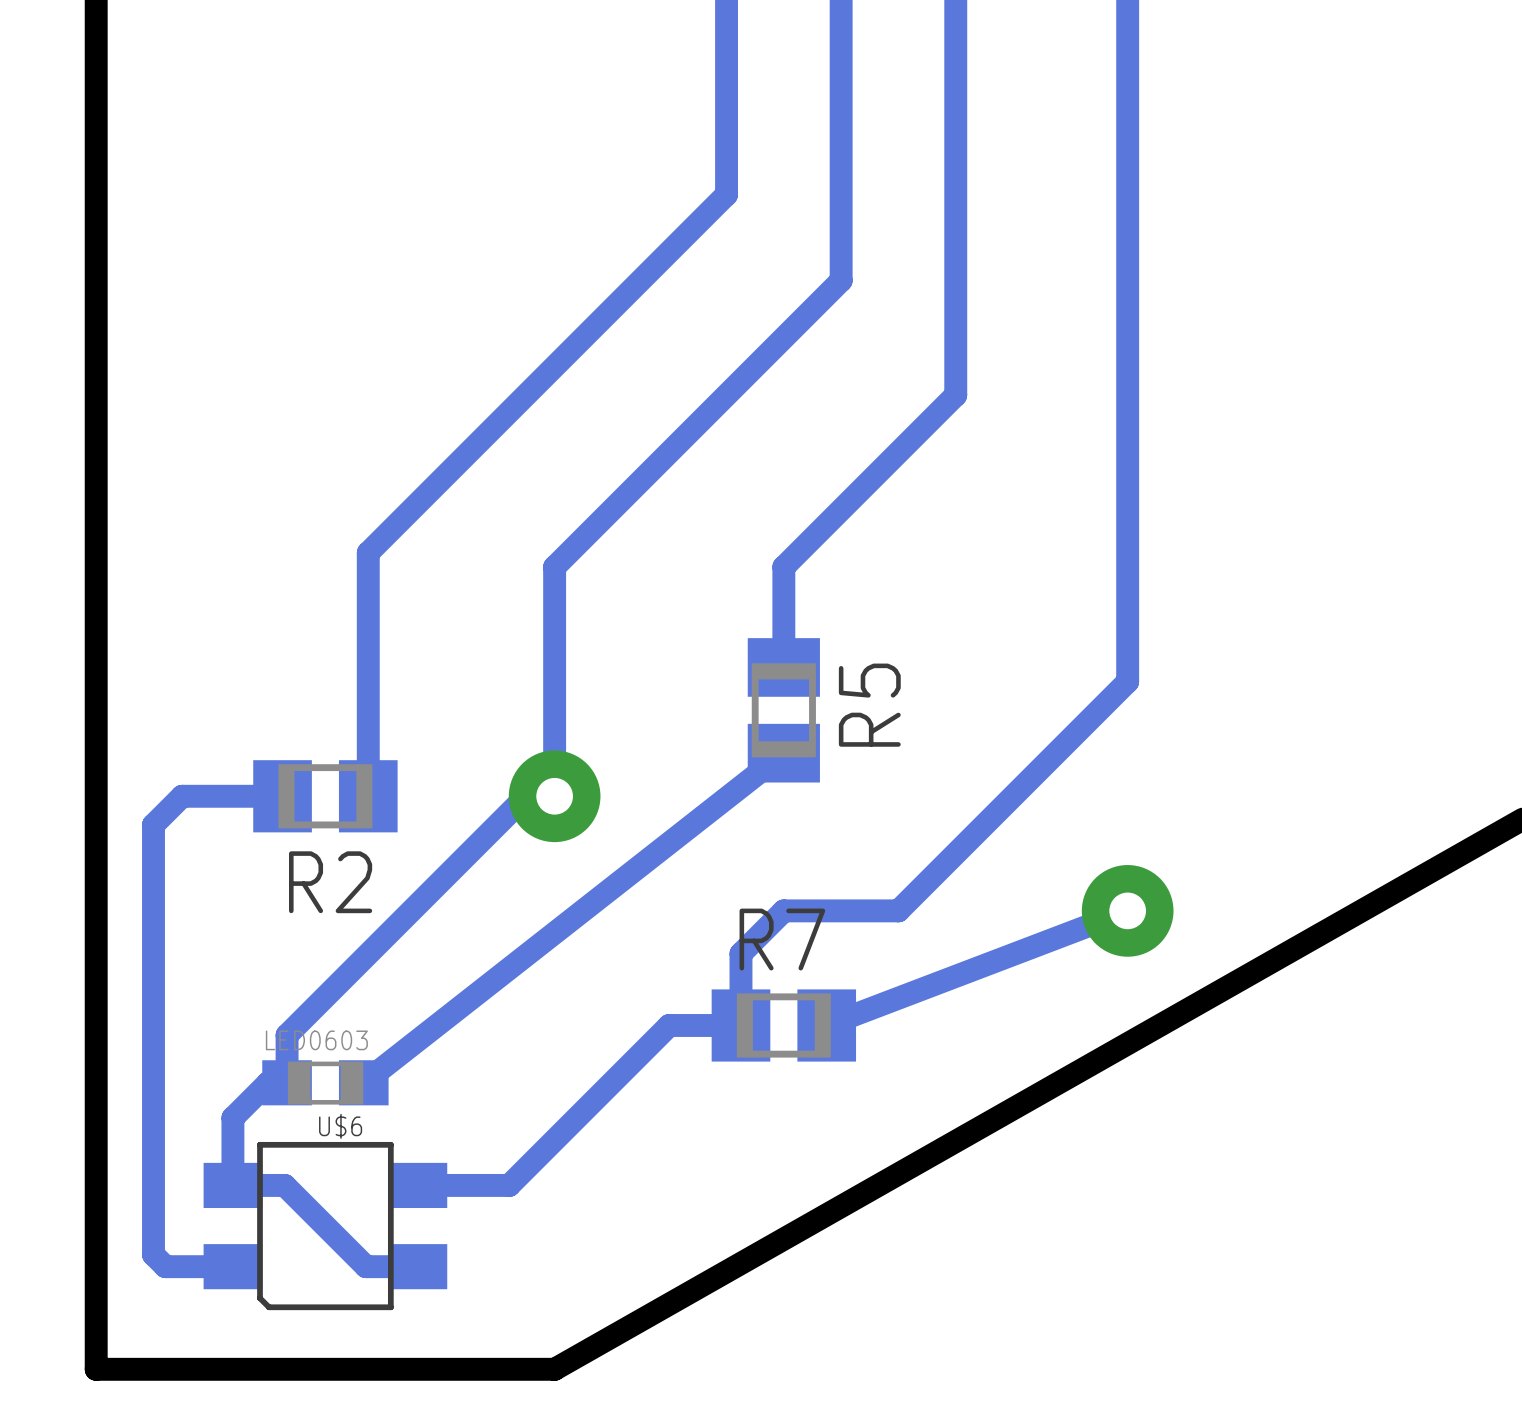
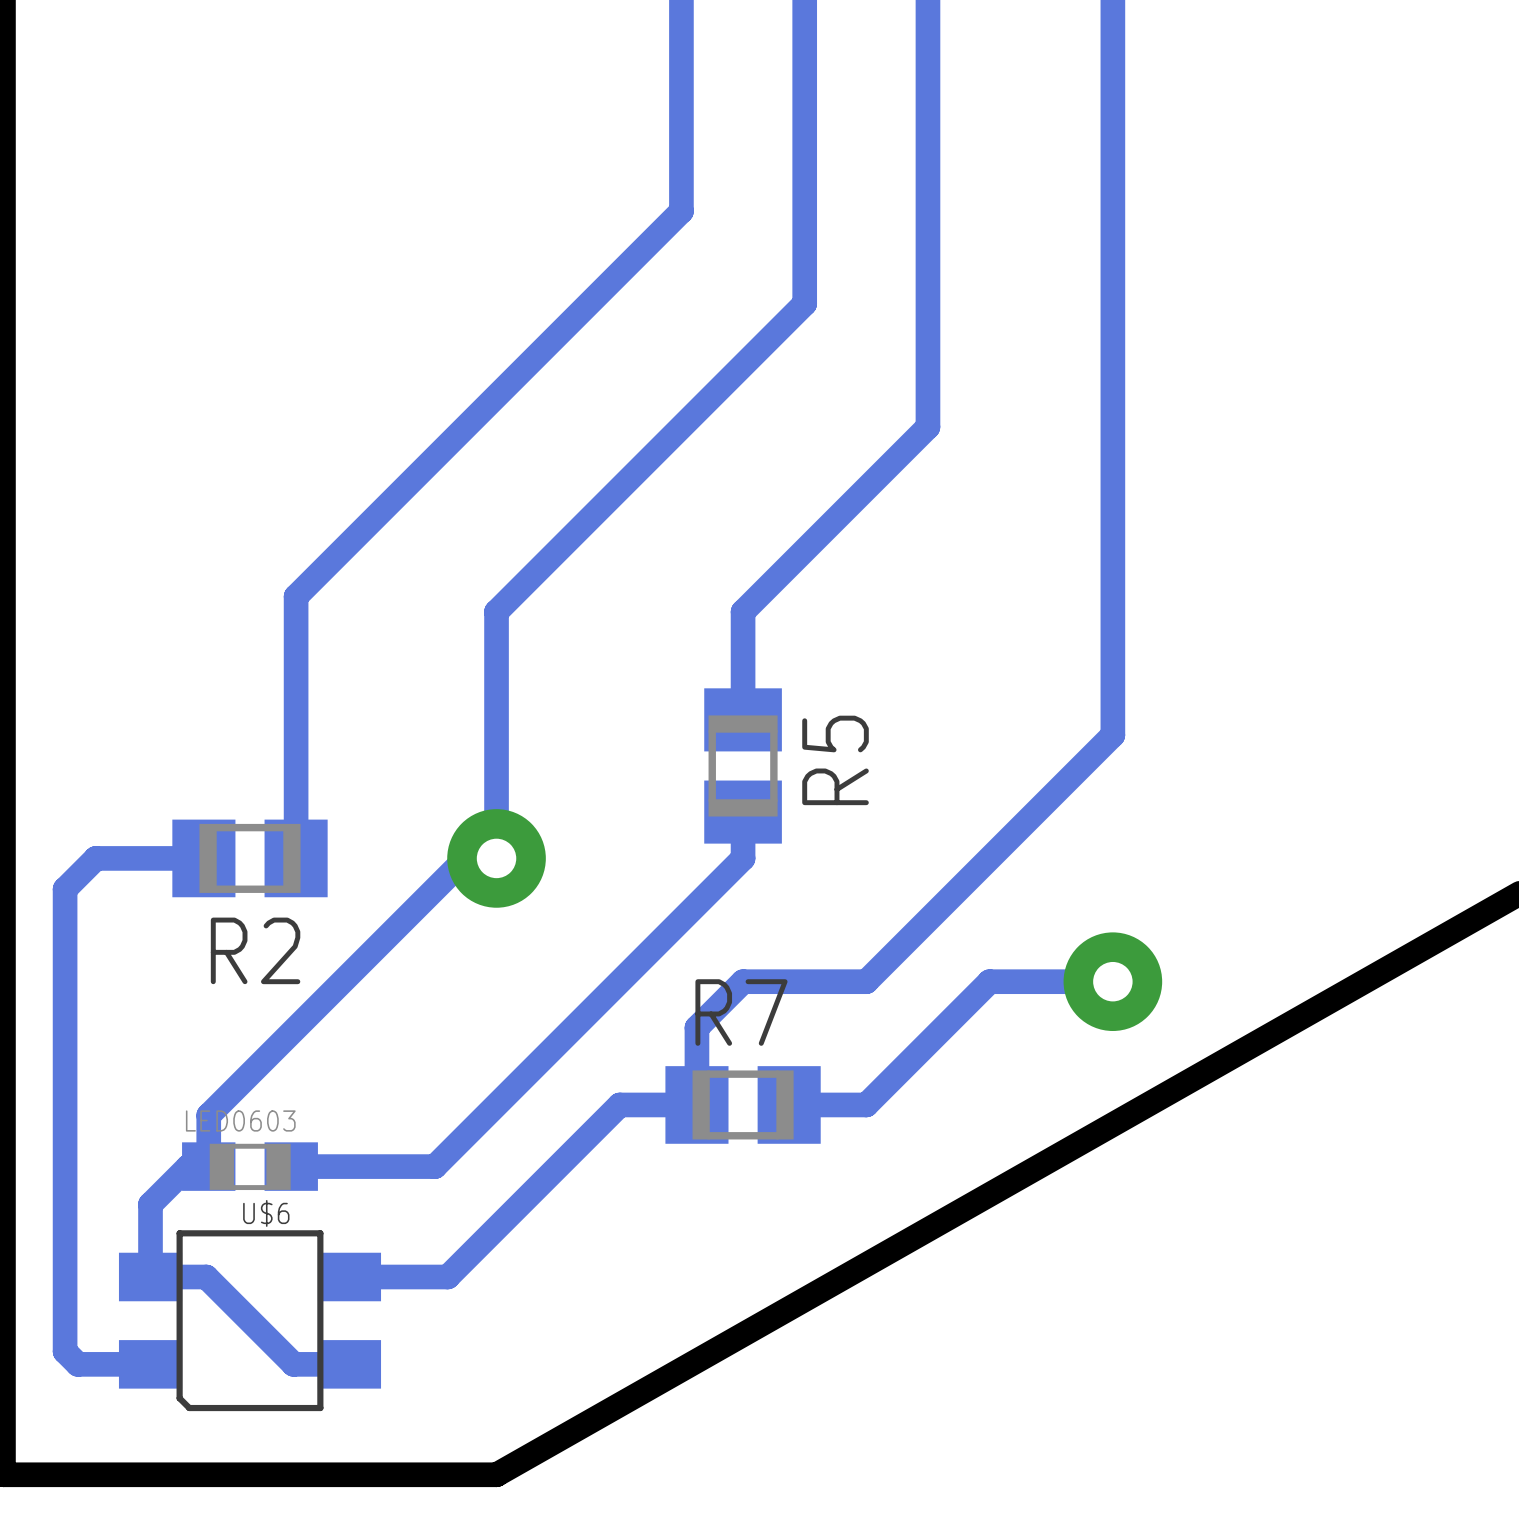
track: (783, 753) (363, 1082) -> (743, 812) (743, 858) (434, 1166) (291, 1166)
track: (1127, 910) (826, 1025) -> (1112, 981) (989, 981) (866, 1104) (789, 1104)

